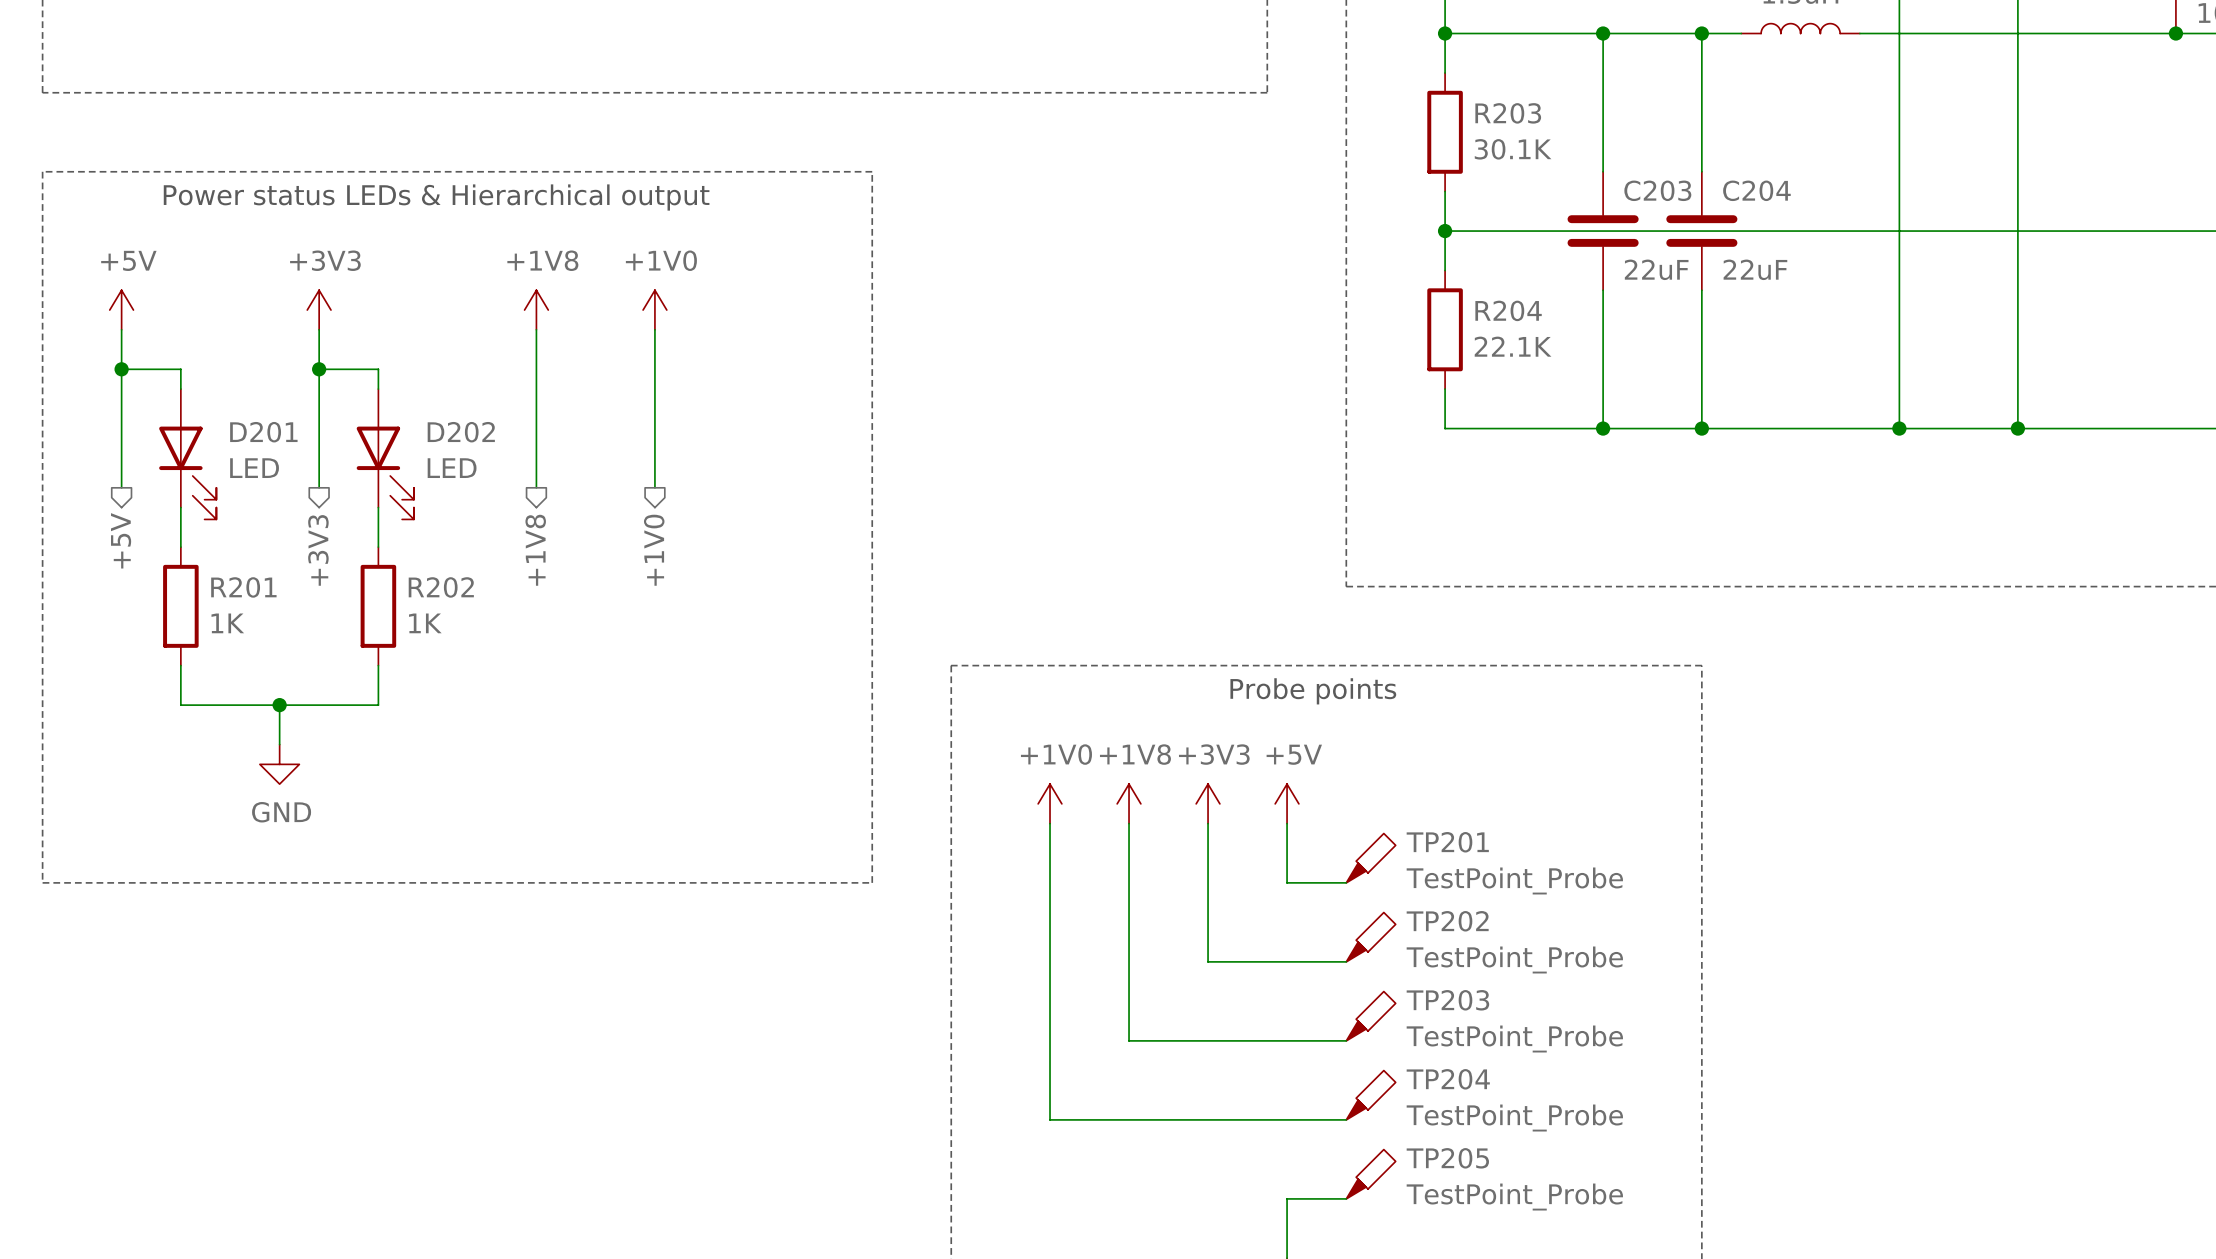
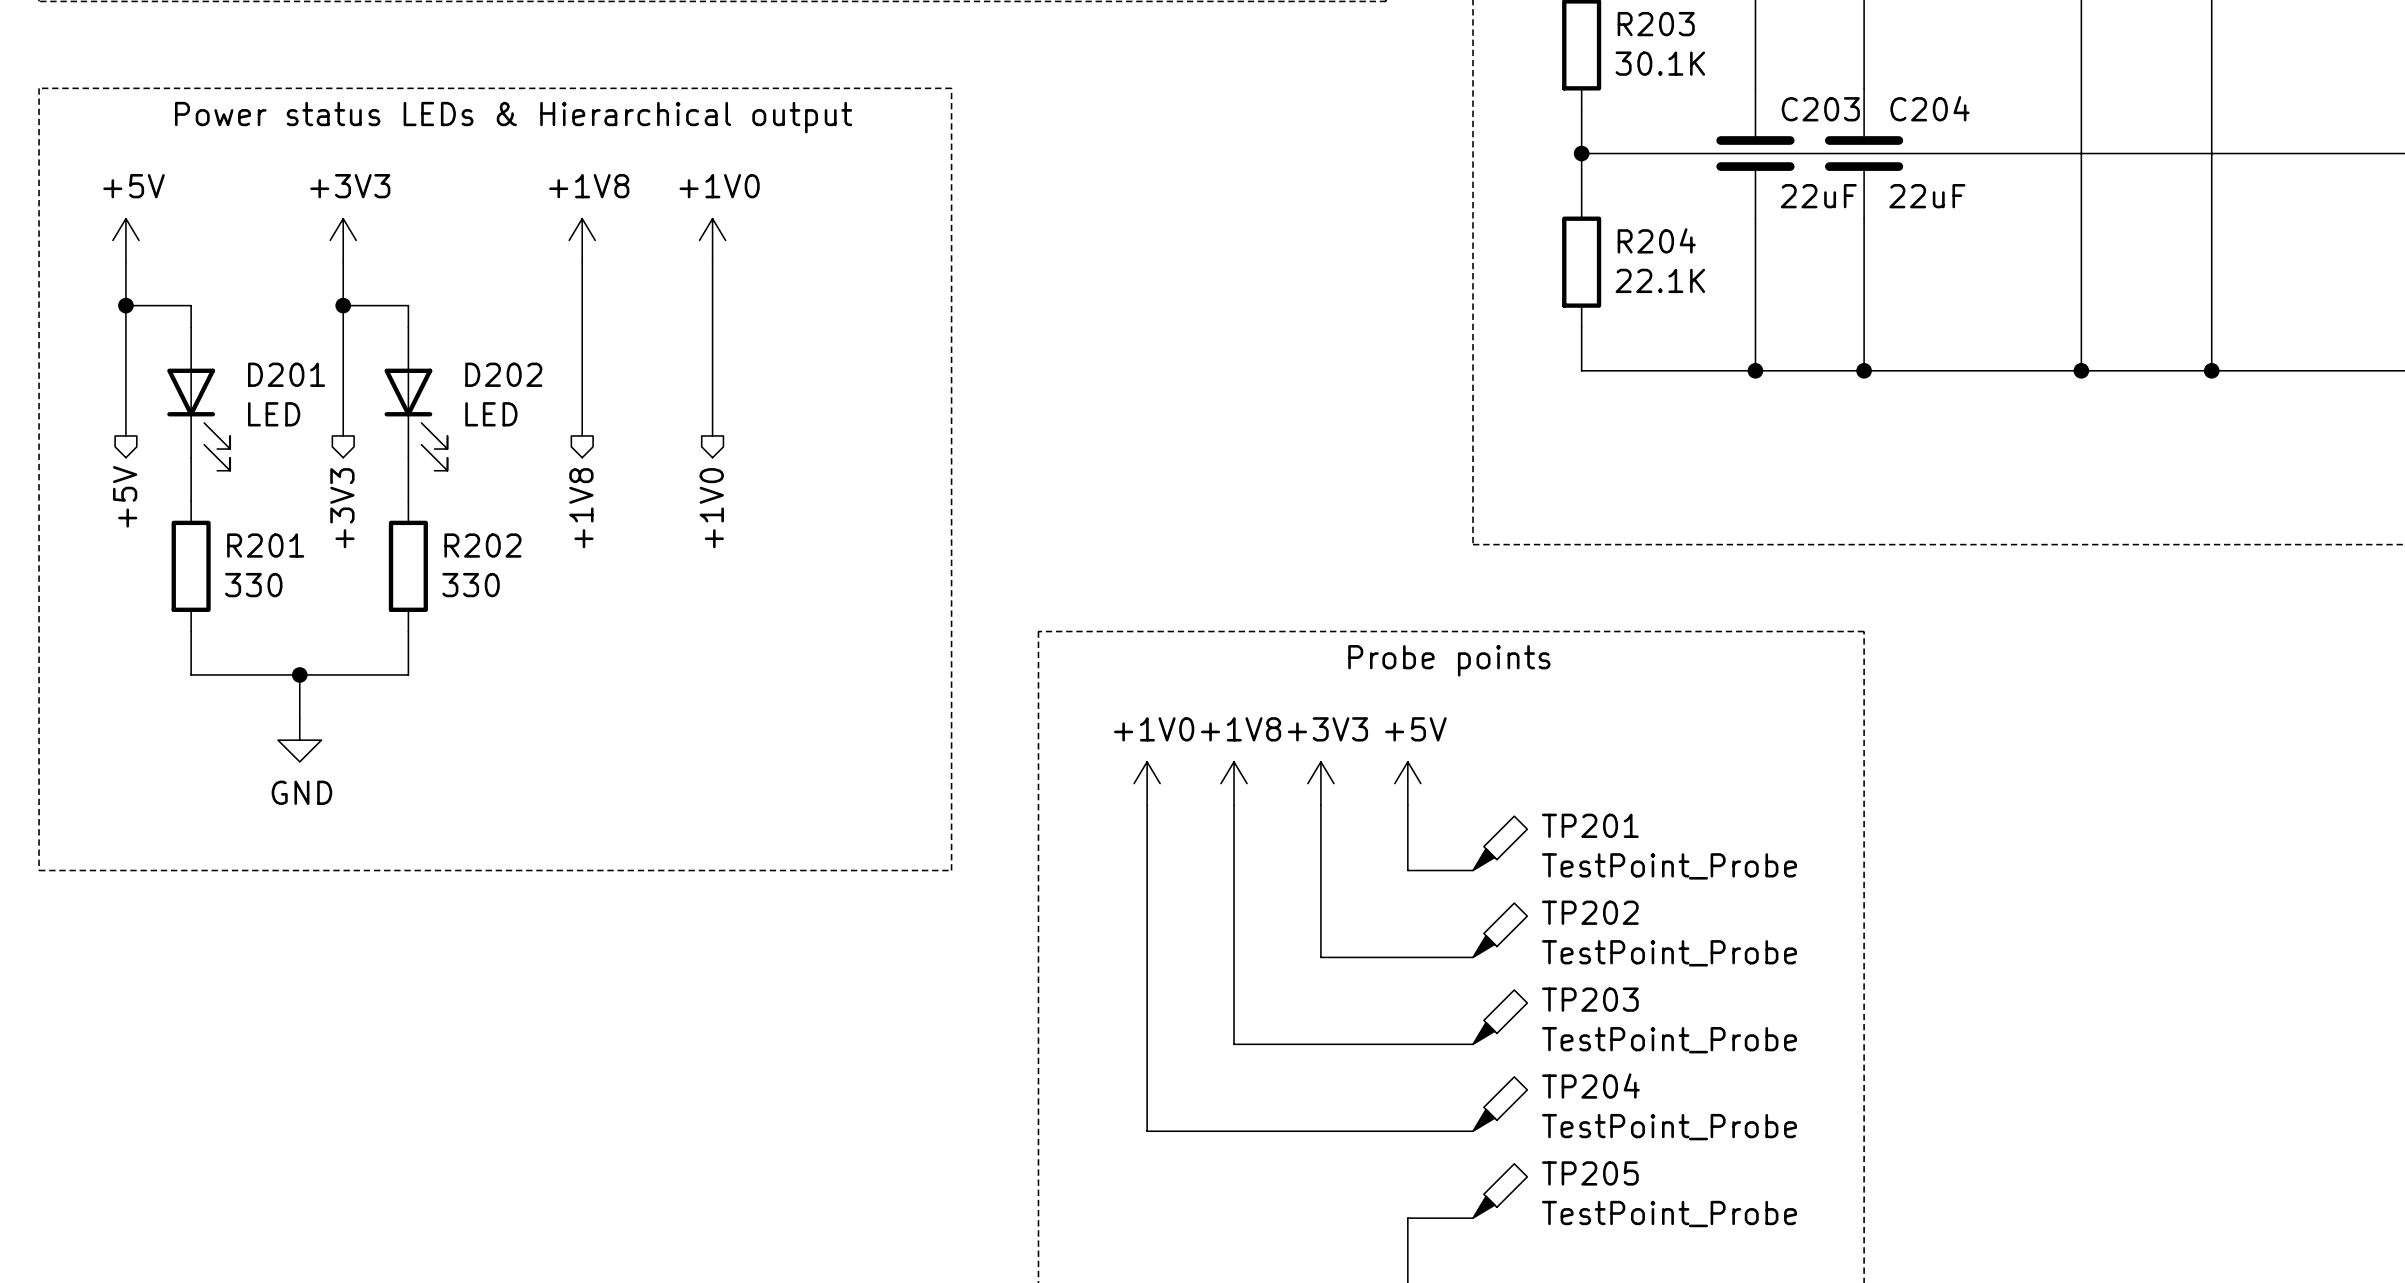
R201 value: 1K (227, 623) -> 330 (253, 585)
R202 value: 1K (425, 623) -> 330 (471, 585)

